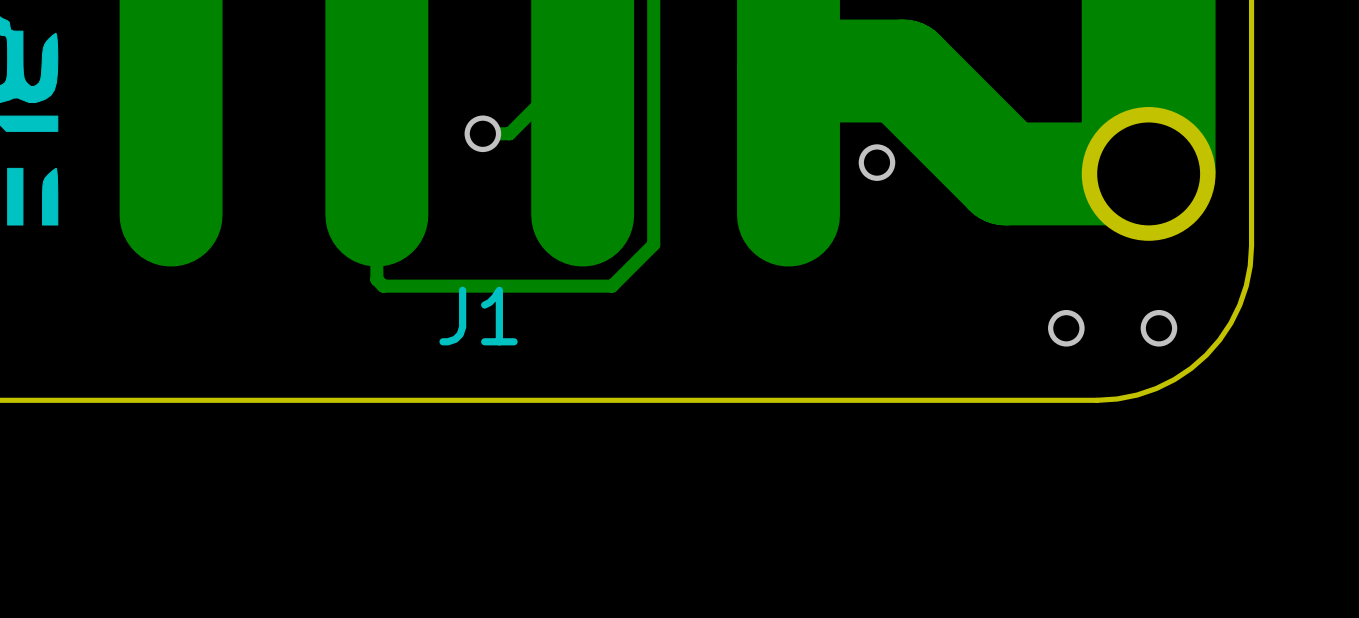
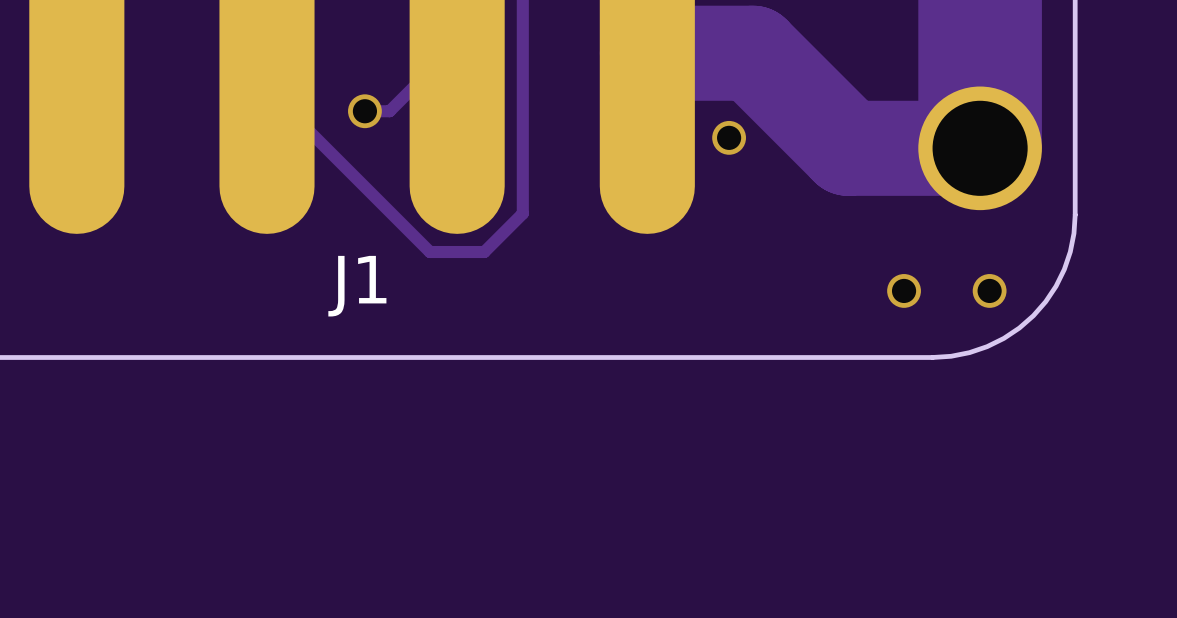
track: (376, 109) (376, 279) (383, 286) (553, 286) -> (267, 89) (429, 252)

